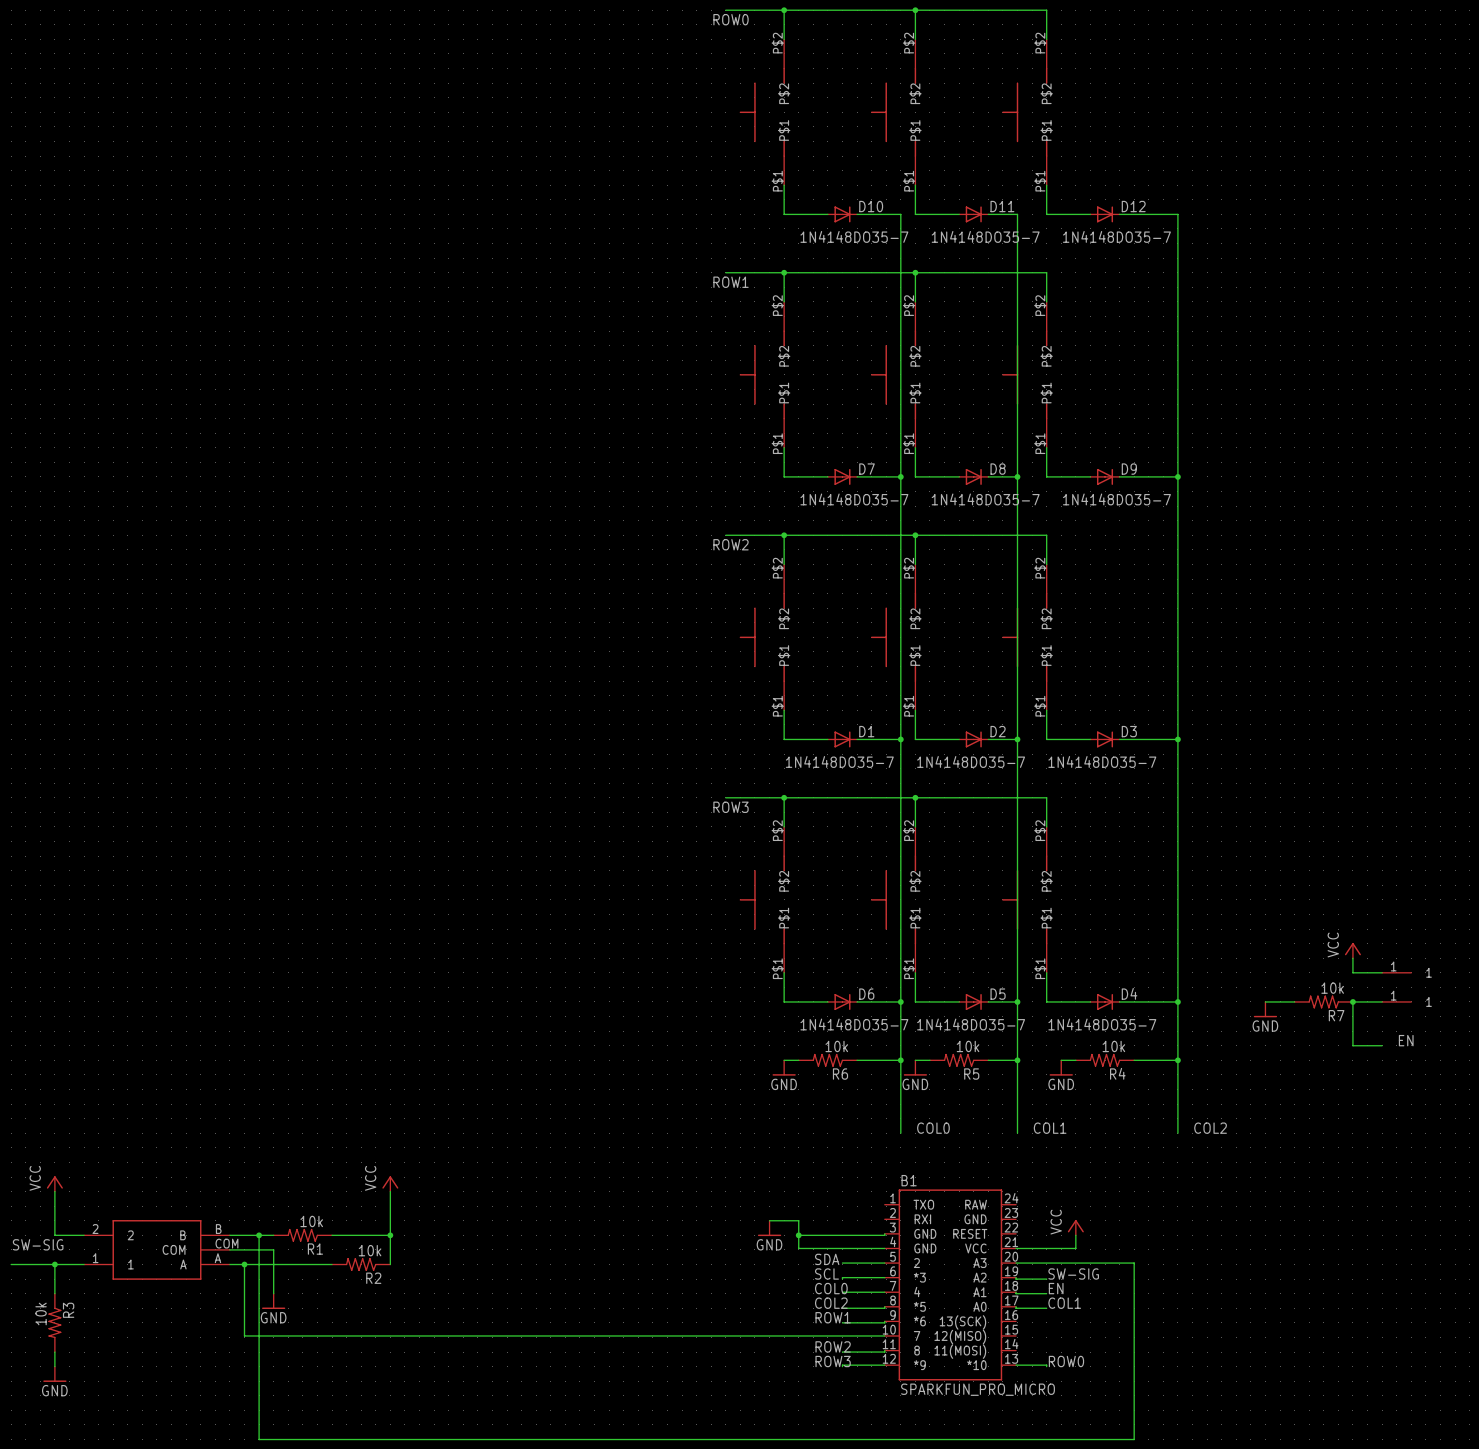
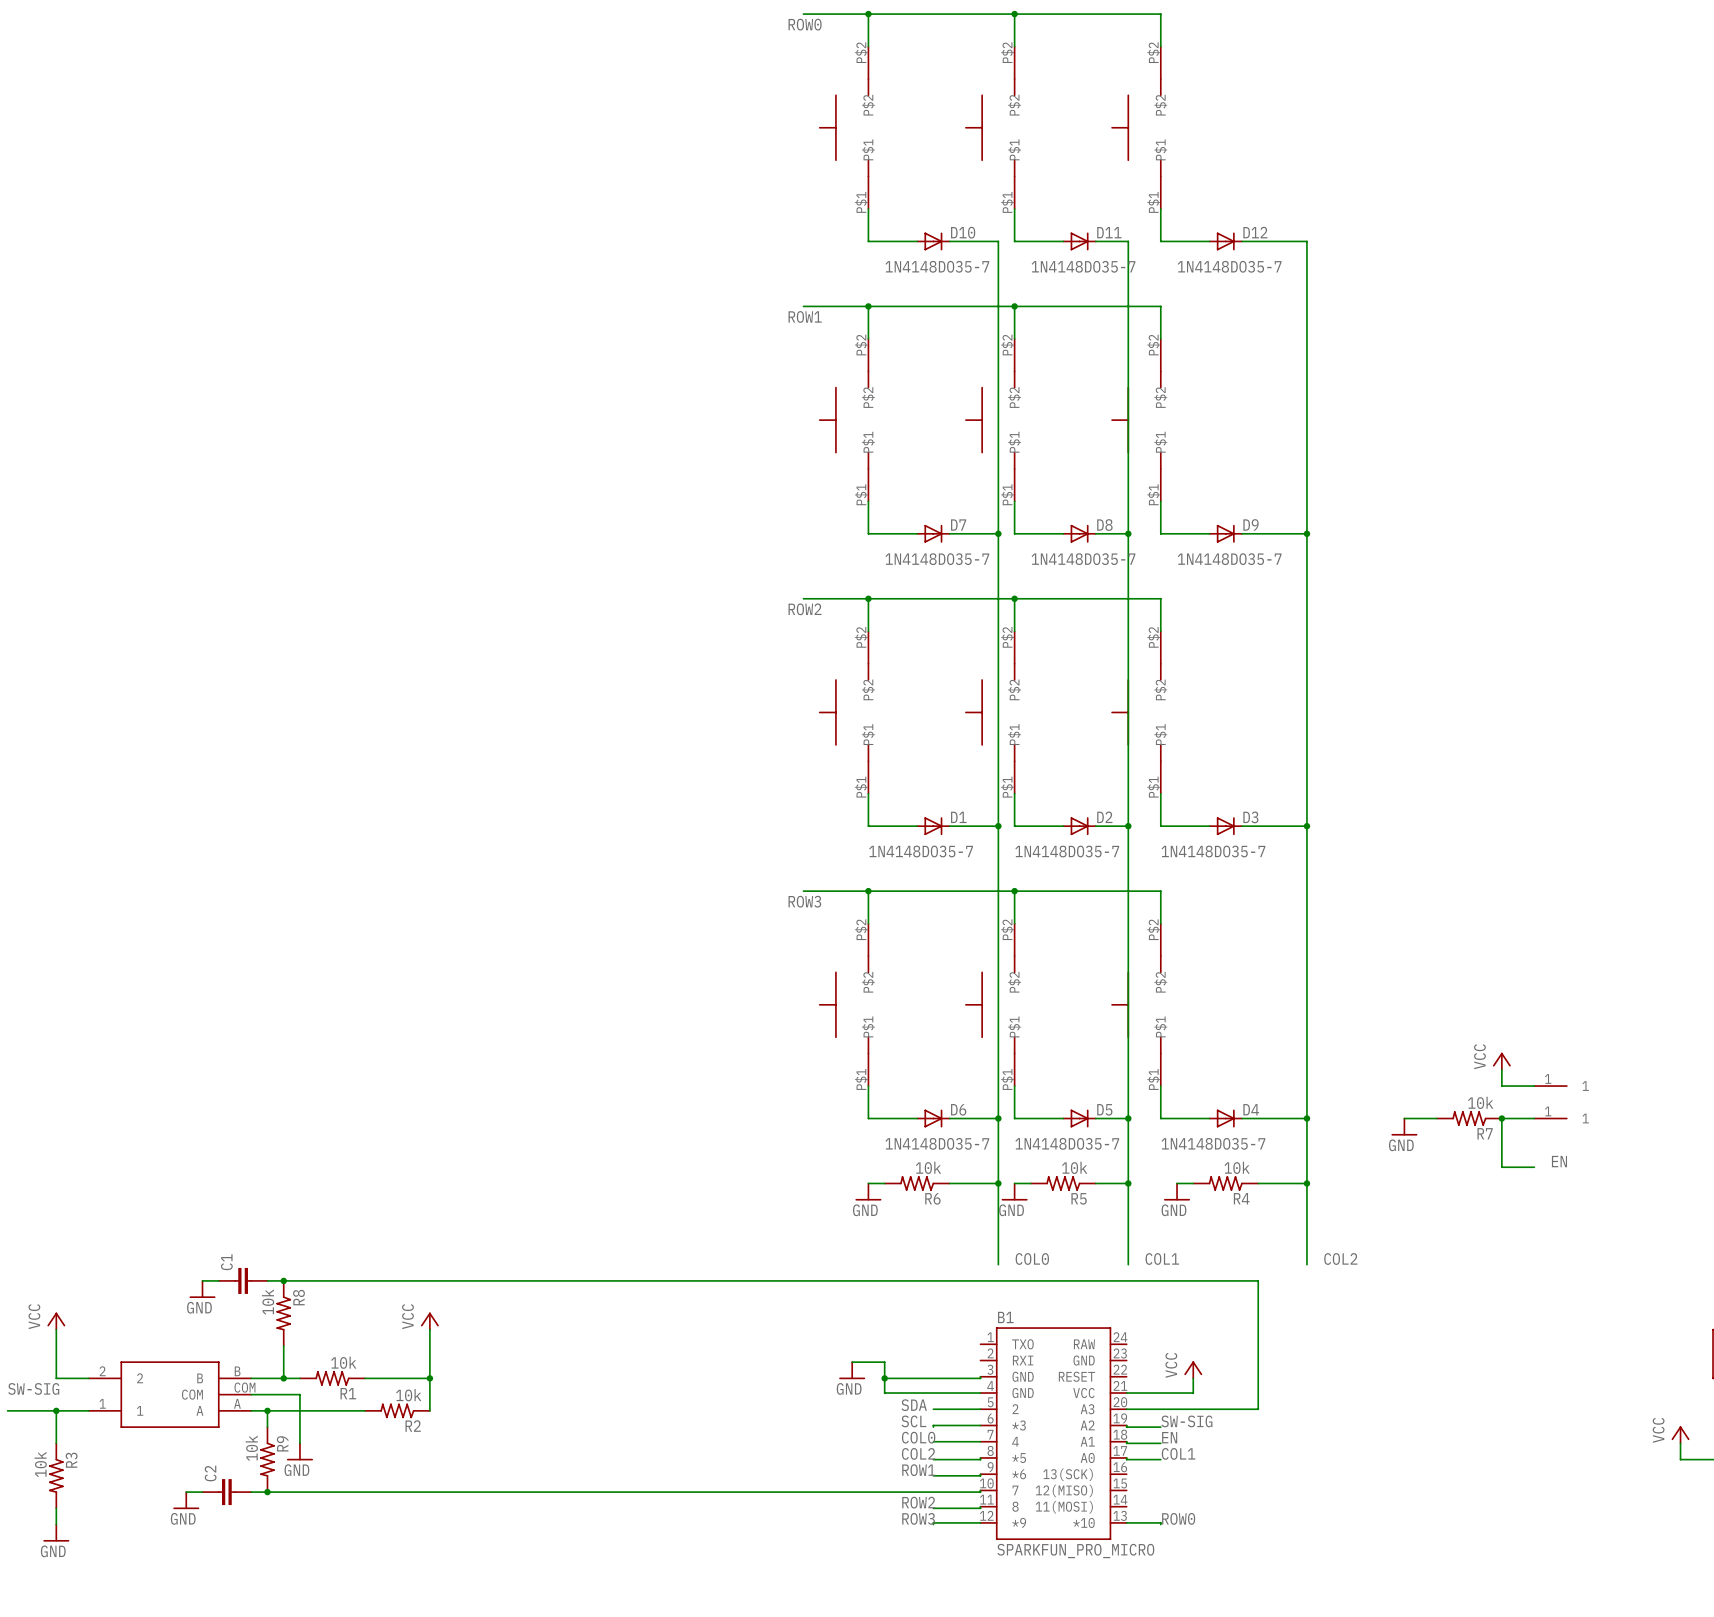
wire: none -> (202, 1280) (218, 1280)
C1: none -> (243, 1280)
junction: none -> (283, 1280)
power symbol: none -> GND (202, 1289)
R8: none -> 10k (283, 1313)
wire: none -> (283, 1345) (283, 1378)
wire: (259, 1235) (259, 1439) (1134, 1439) (1134, 1263) -> (267, 1280) (1258, 1280) (1258, 1409)
wire: (244, 1279) (244, 1335) (884, 1335) -> (251, 1492) (980, 1492) (980, 1490)
R9: none -> 10k (267, 1459)
wire: none -> (186, 1492) (202, 1492)
C2: none -> (226, 1492)
junction: none -> (267, 1492)
power symbol: none -> GND (186, 1500)

